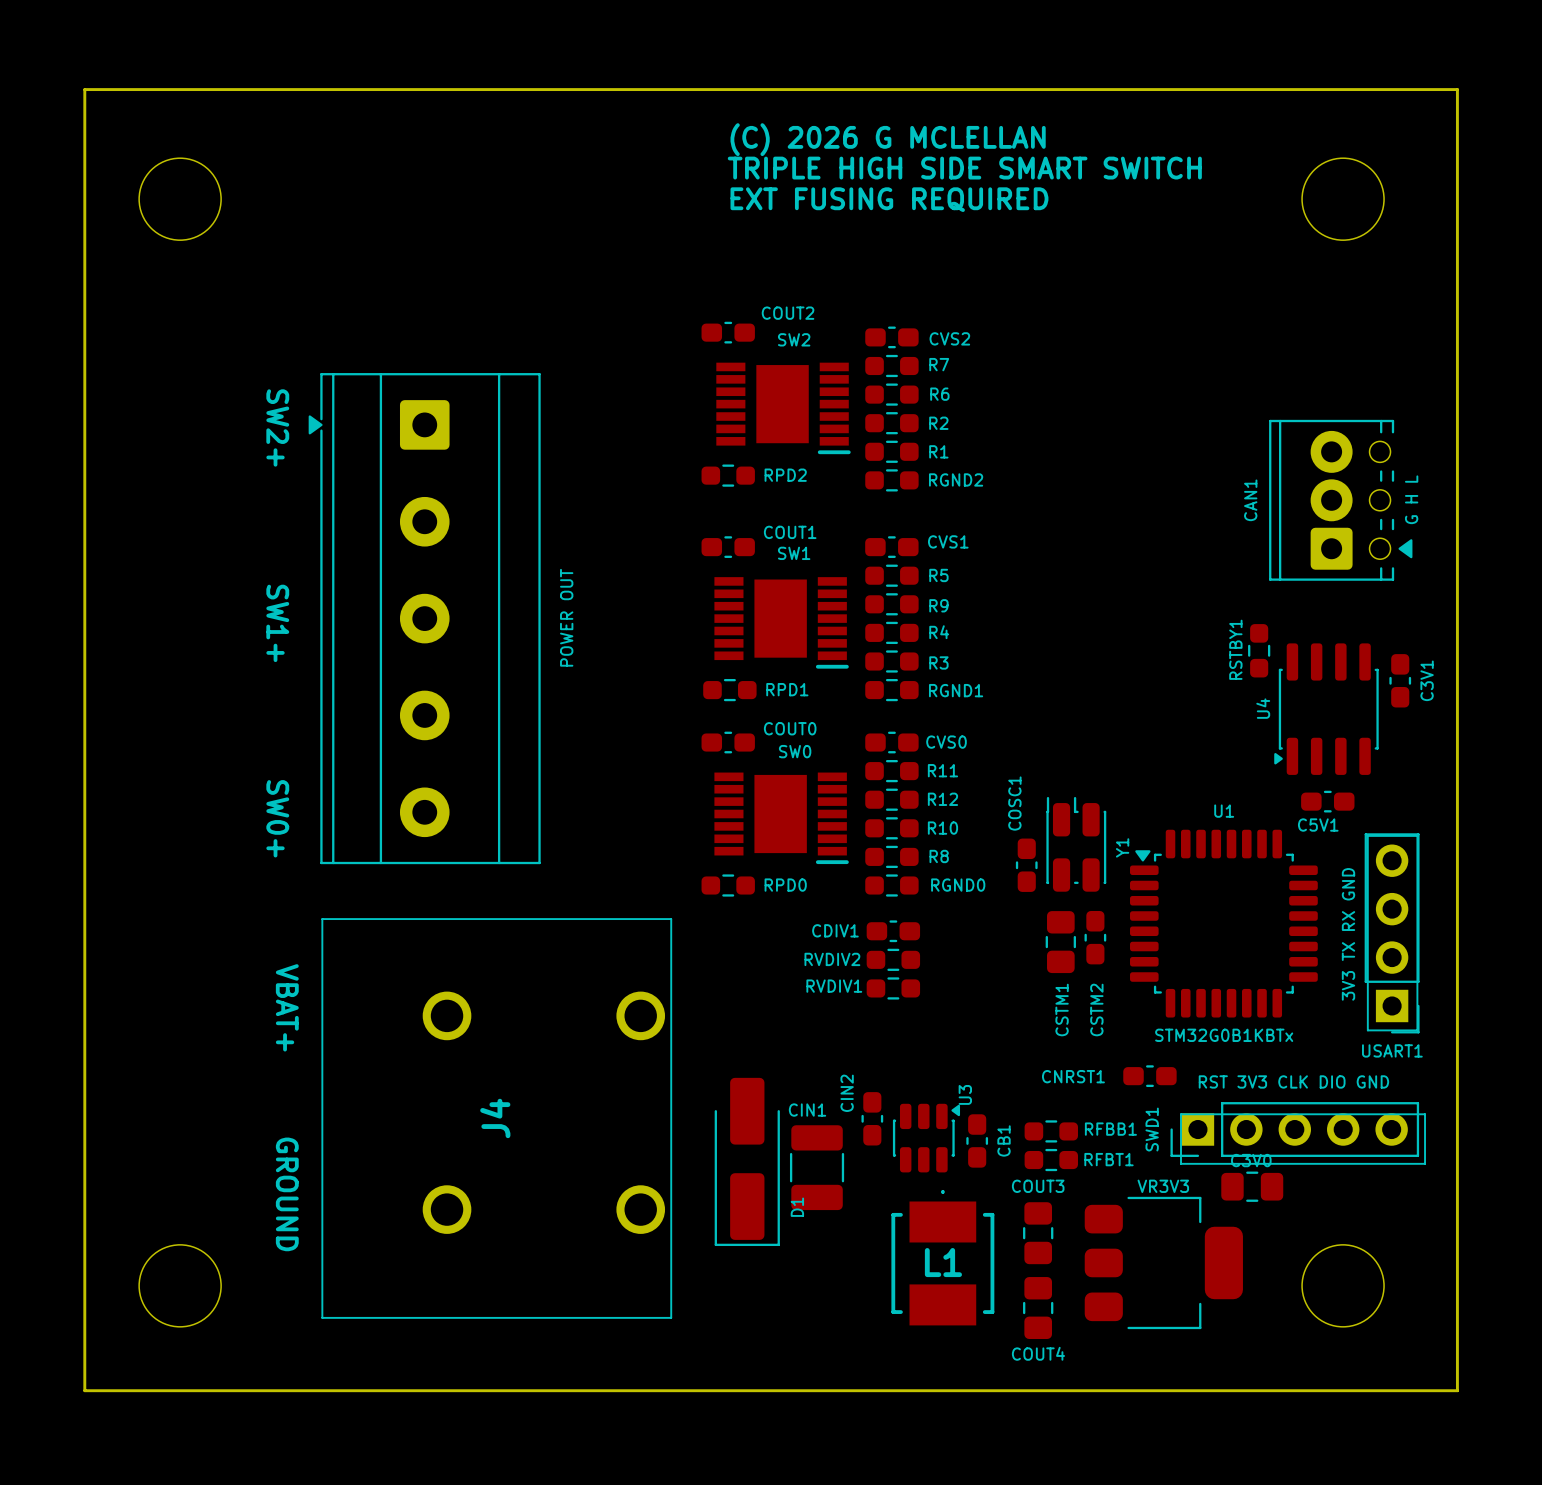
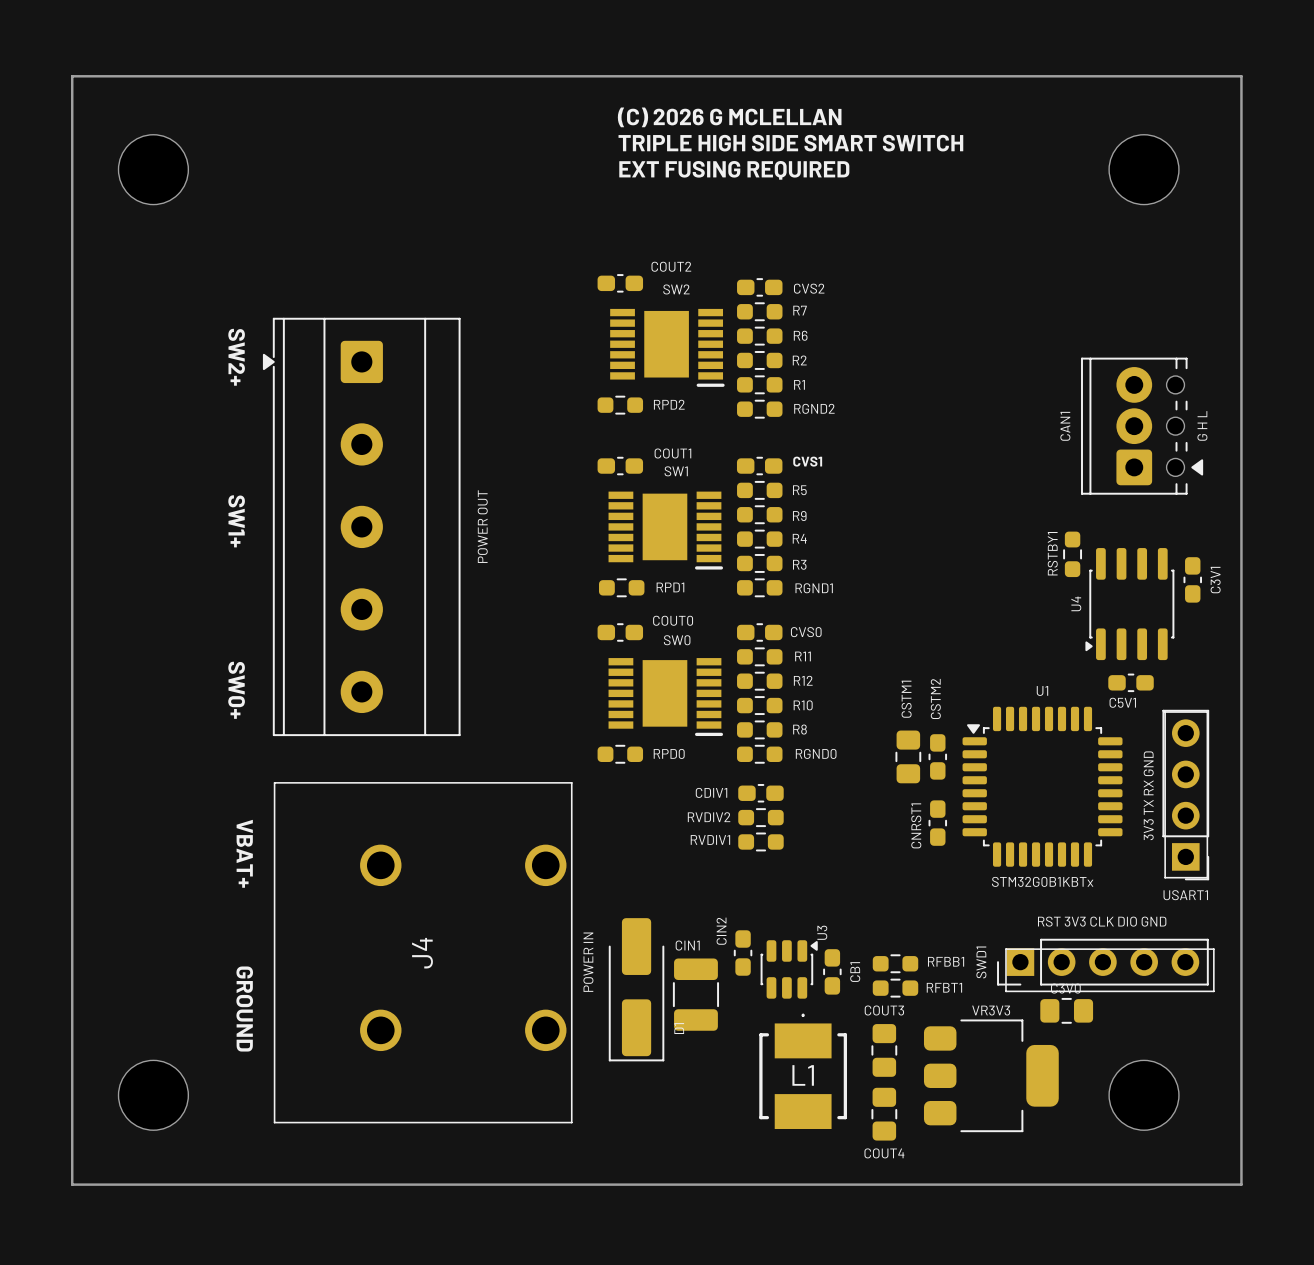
Y1: (1076, 844) -> none
COSC1: (1026, 865) -> none
CSTM2 position: (1095, 937) -> (937, 756)
CSTM1 position: (1060, 942) -> (908, 756)
CSTM1 name position: CSTM1 (1062, 1009) -> CSTM1 (906, 699)
CSTM2 name position: CSTM2 (1096, 1009) -> CSTM2 (935, 698)
CNRST1 name position: CNRST1 (1073, 1076) -> CNRST1 (916, 825)
CNRST1 rotation: 0° (1149, 1076) -> 90° clockwise (937, 823)
CNRST1 position: (1149, 1076) -> (937, 823)
J4 value: none -> POWER IN (588, 962)

